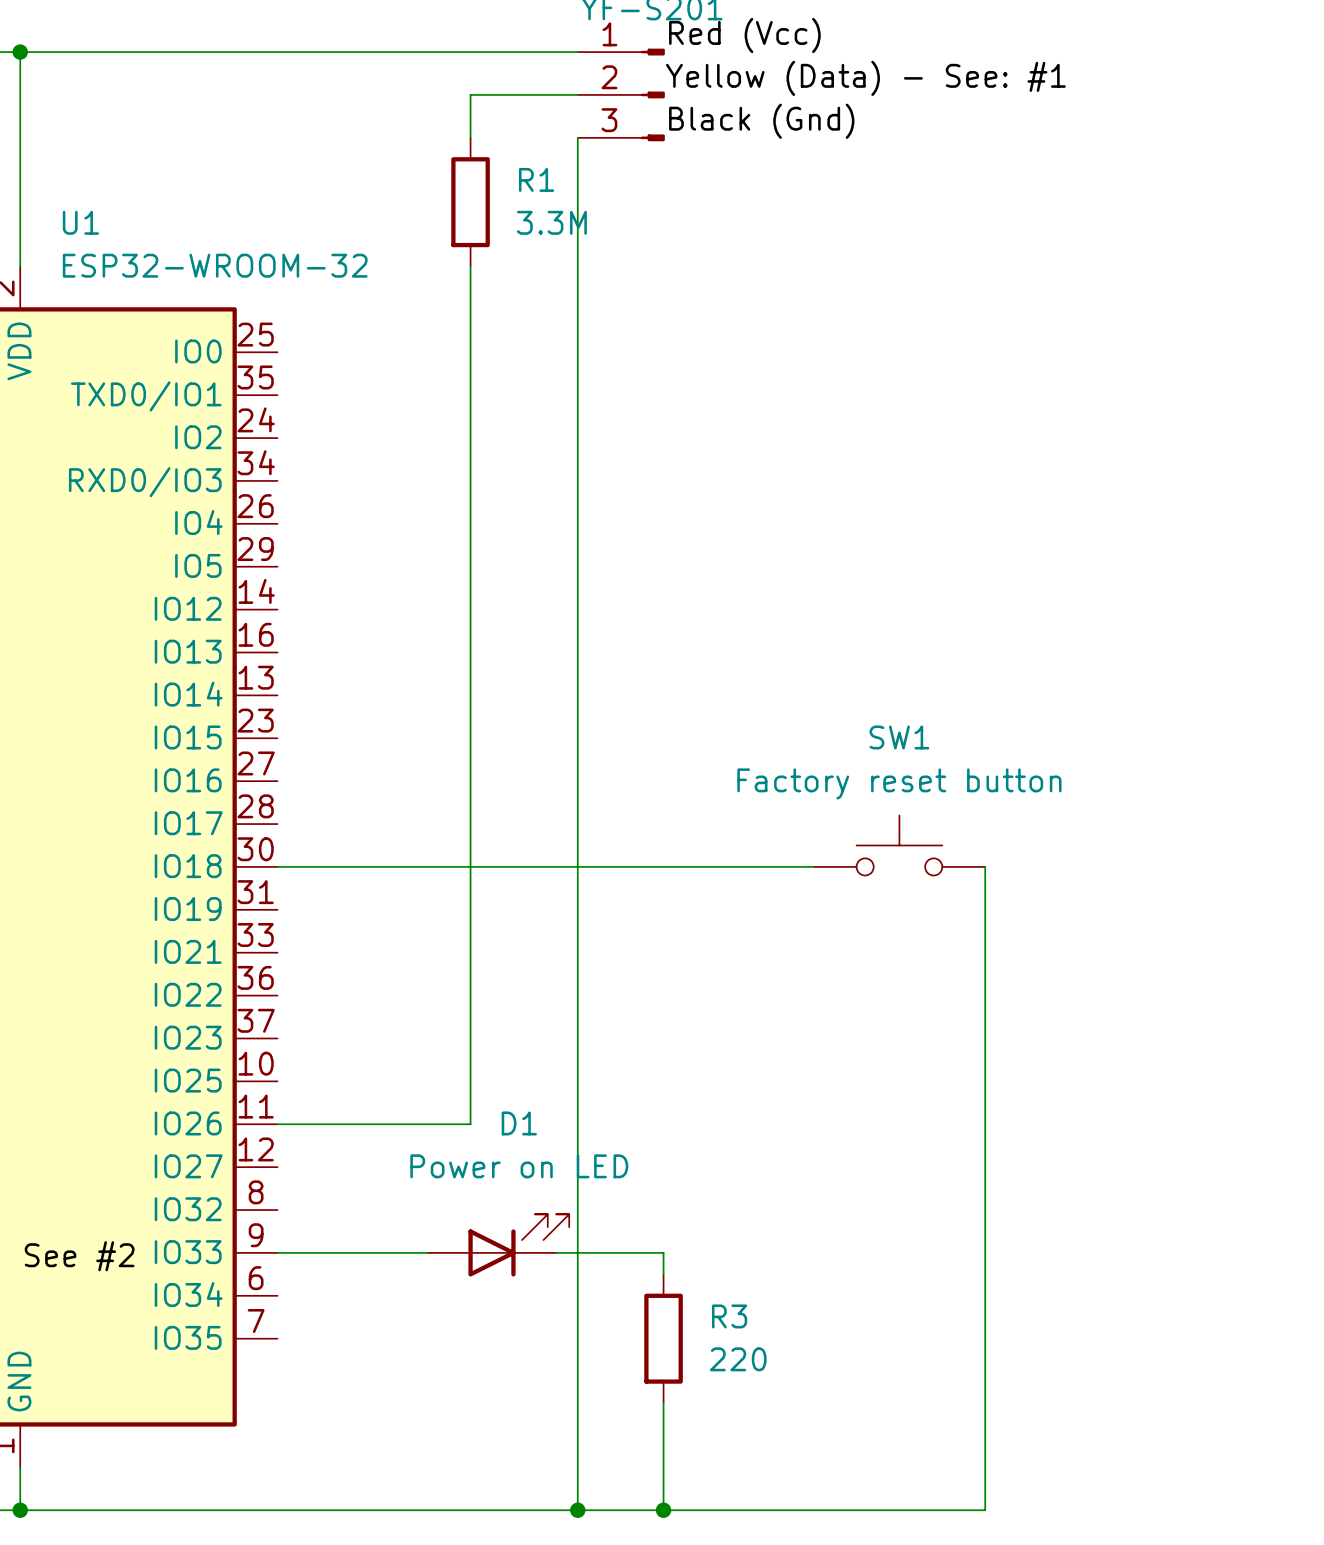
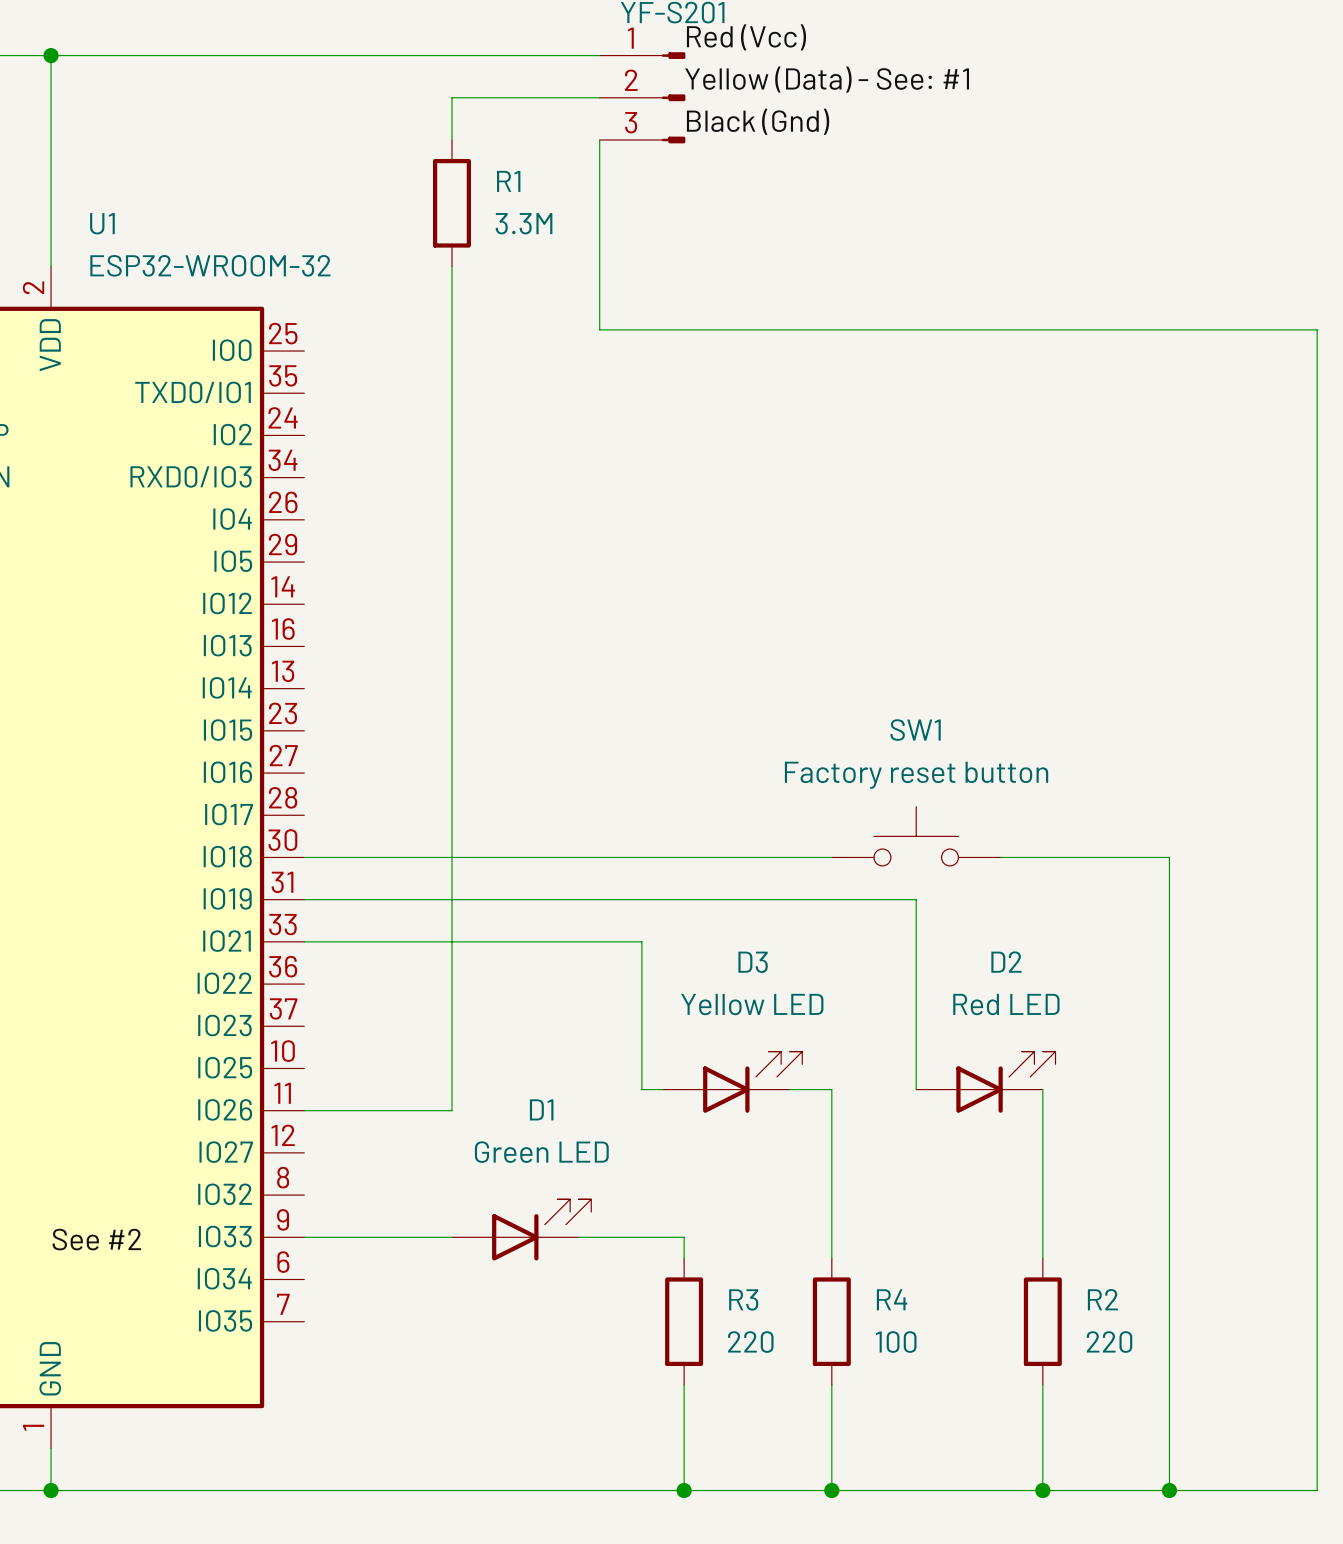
wire: (470, 94) (470, 137) -> (494, 97) (451, 97) (451, 139)
R1 position: (470, 202) -> (451, 203)
wire: (470, 266) (470, 1124) (427, 1124) -> (451, 266) (451, 1110)
wire: (577, 330) (577, 1510) -> (599, 329) (1317, 329) (1317, 1490) (1000, 1490)
wire: (985, 866) (985, 1510) -> (1000, 857) (1169, 857) (1169, 1490)
wire: none -> (304, 899) (916, 899) (916, 1089)
wire: none -> (304, 941) (641, 941) (641, 1089) (663, 1089)
D3: none -> Yellow LED (732, 1082)
D2: none -> Red LED (985, 1082)
wire: none -> (789, 1089) (831, 1089) (831, 1258)
wire: none -> (1042, 1089) (1042, 1258)
D1 value: Power on LED (519, 1166) -> Green LED (541, 1152)
R4: none -> 100 (831, 1321)
R2: none -> 220 (1042, 1321)
wire: none -> (831, 1385) (831, 1490)
wire: none -> (1042, 1385) (1042, 1490)
junction: (577, 1510) -> none
junction: none -> (831, 1490)
junction: none -> (1042, 1490)
junction: none -> (1169, 1490)

